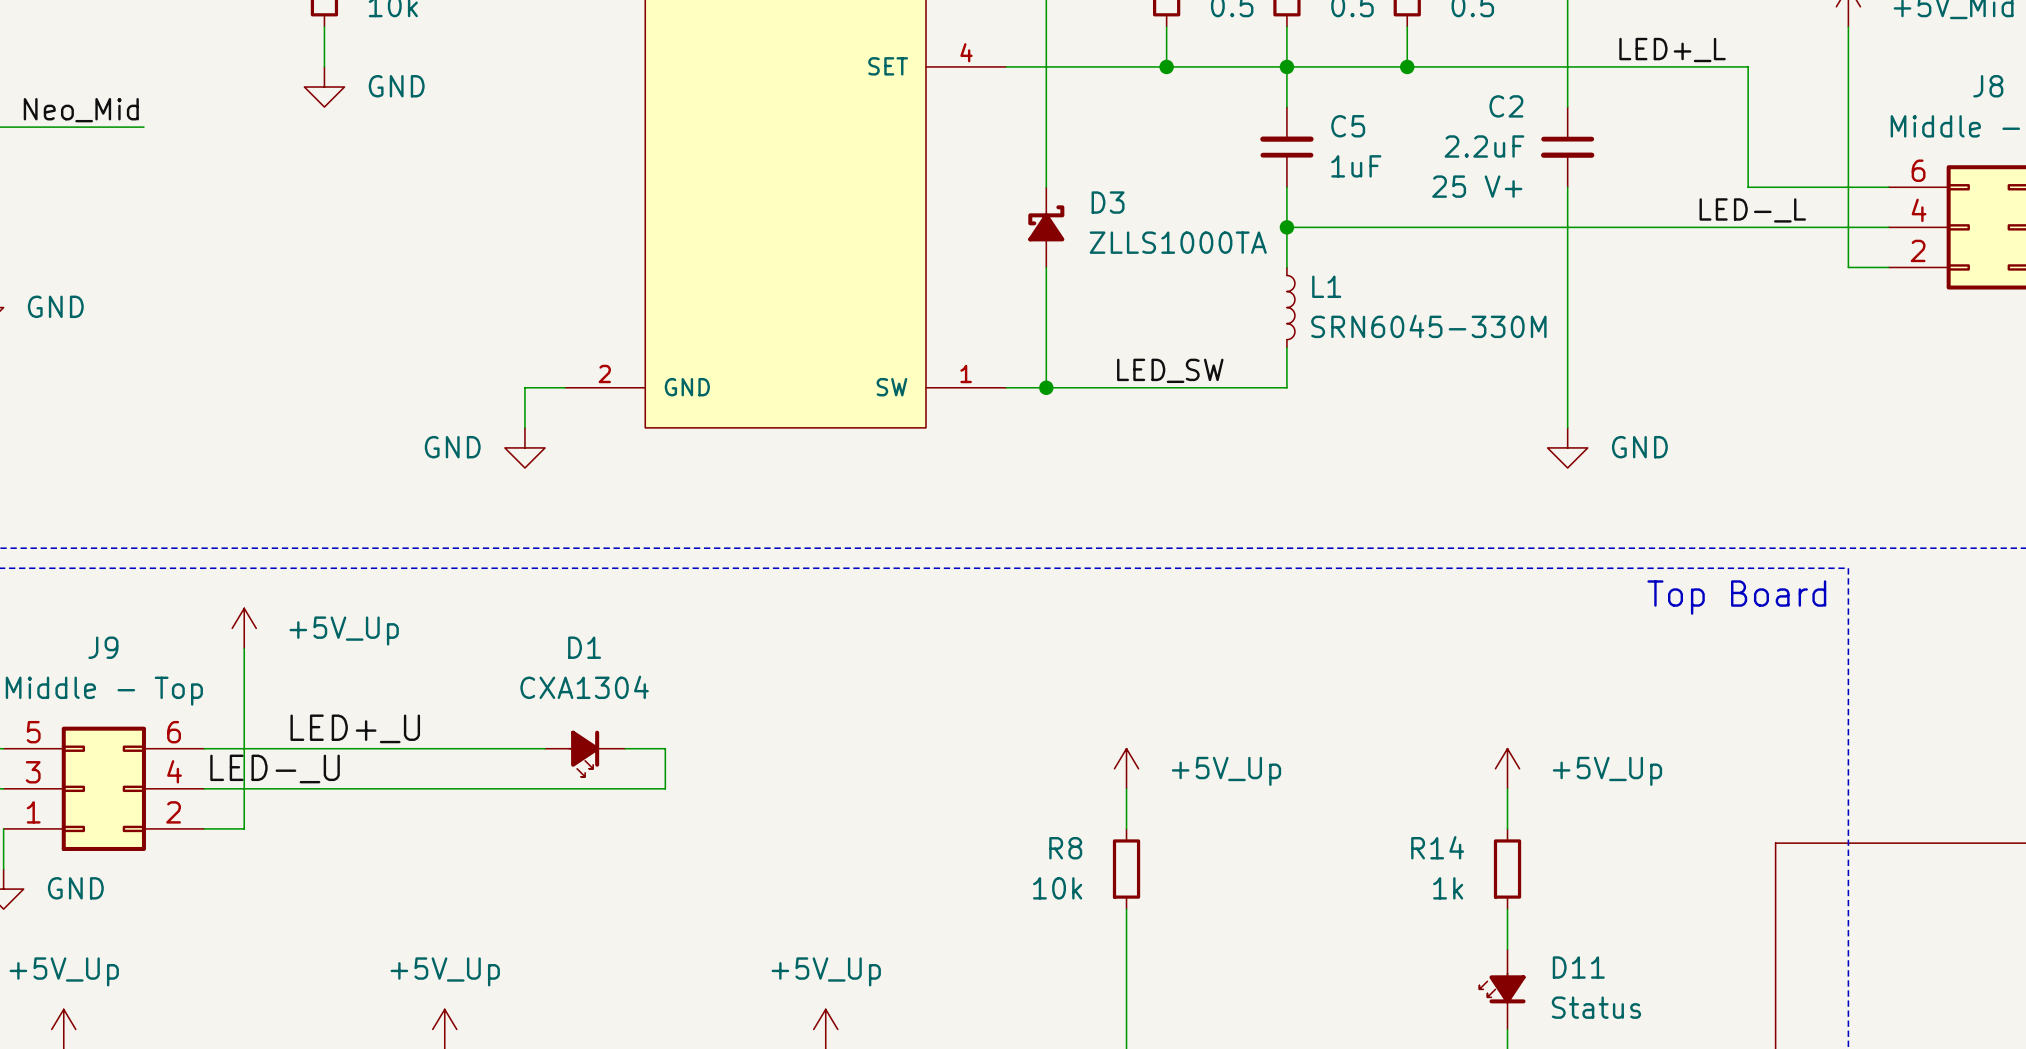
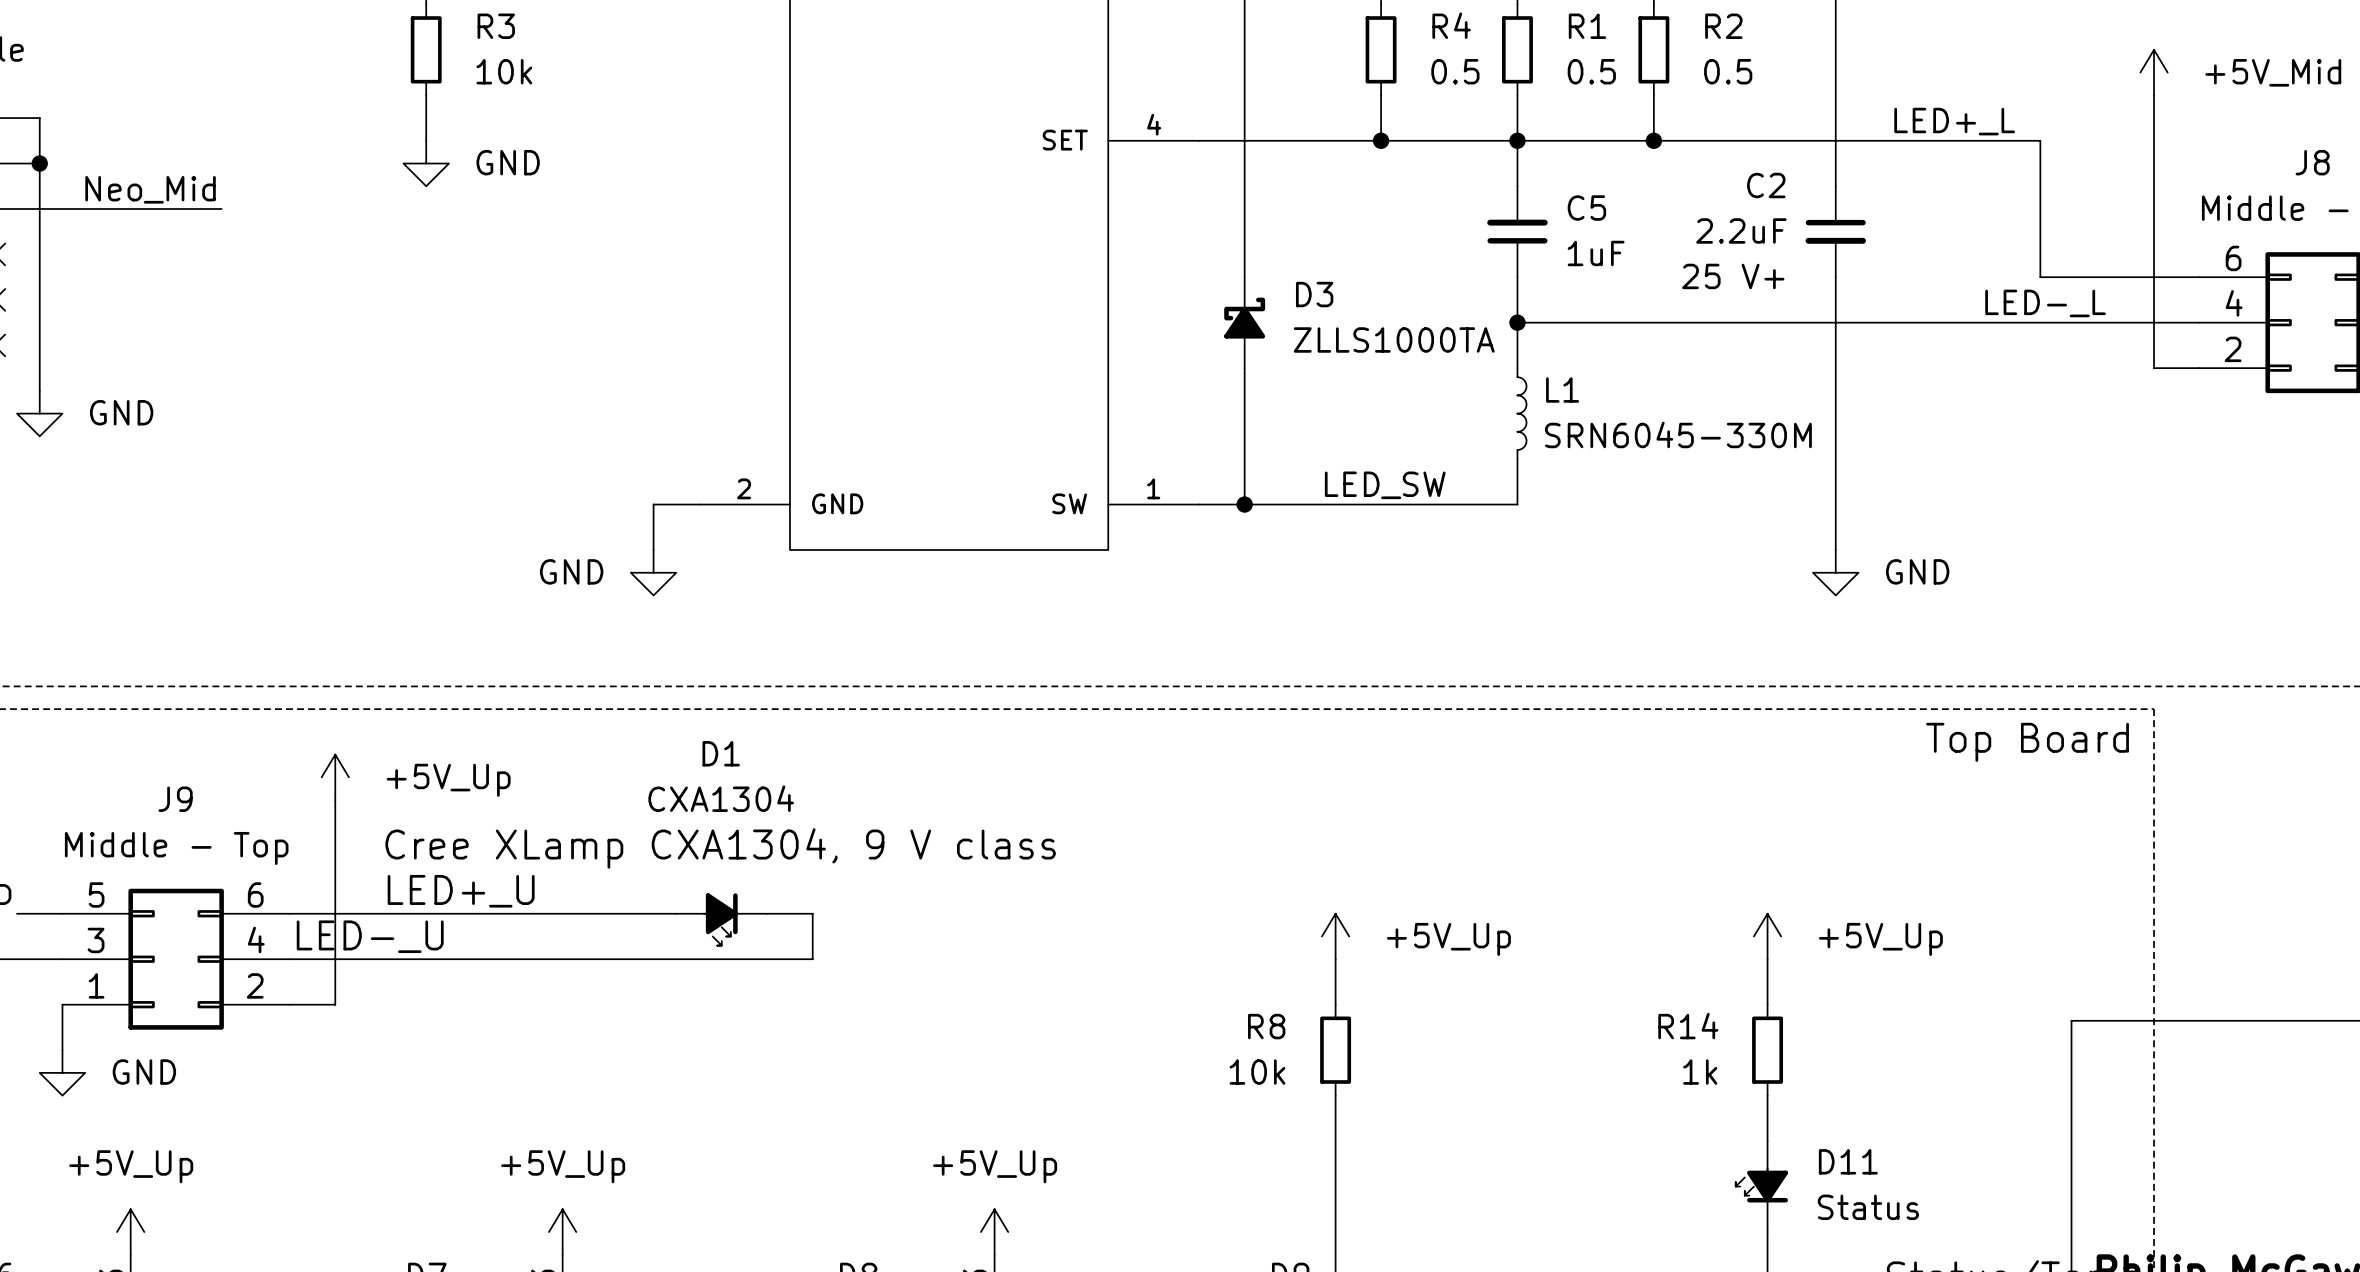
D1 name position: D1 (584, 647) -> D1 (721, 753)
D1 value position: CXA1304 (584, 687) -> CXA1304 (721, 798)
D1 text: none -> Cree XLamp CXA1304, 9 V class (720, 848)

